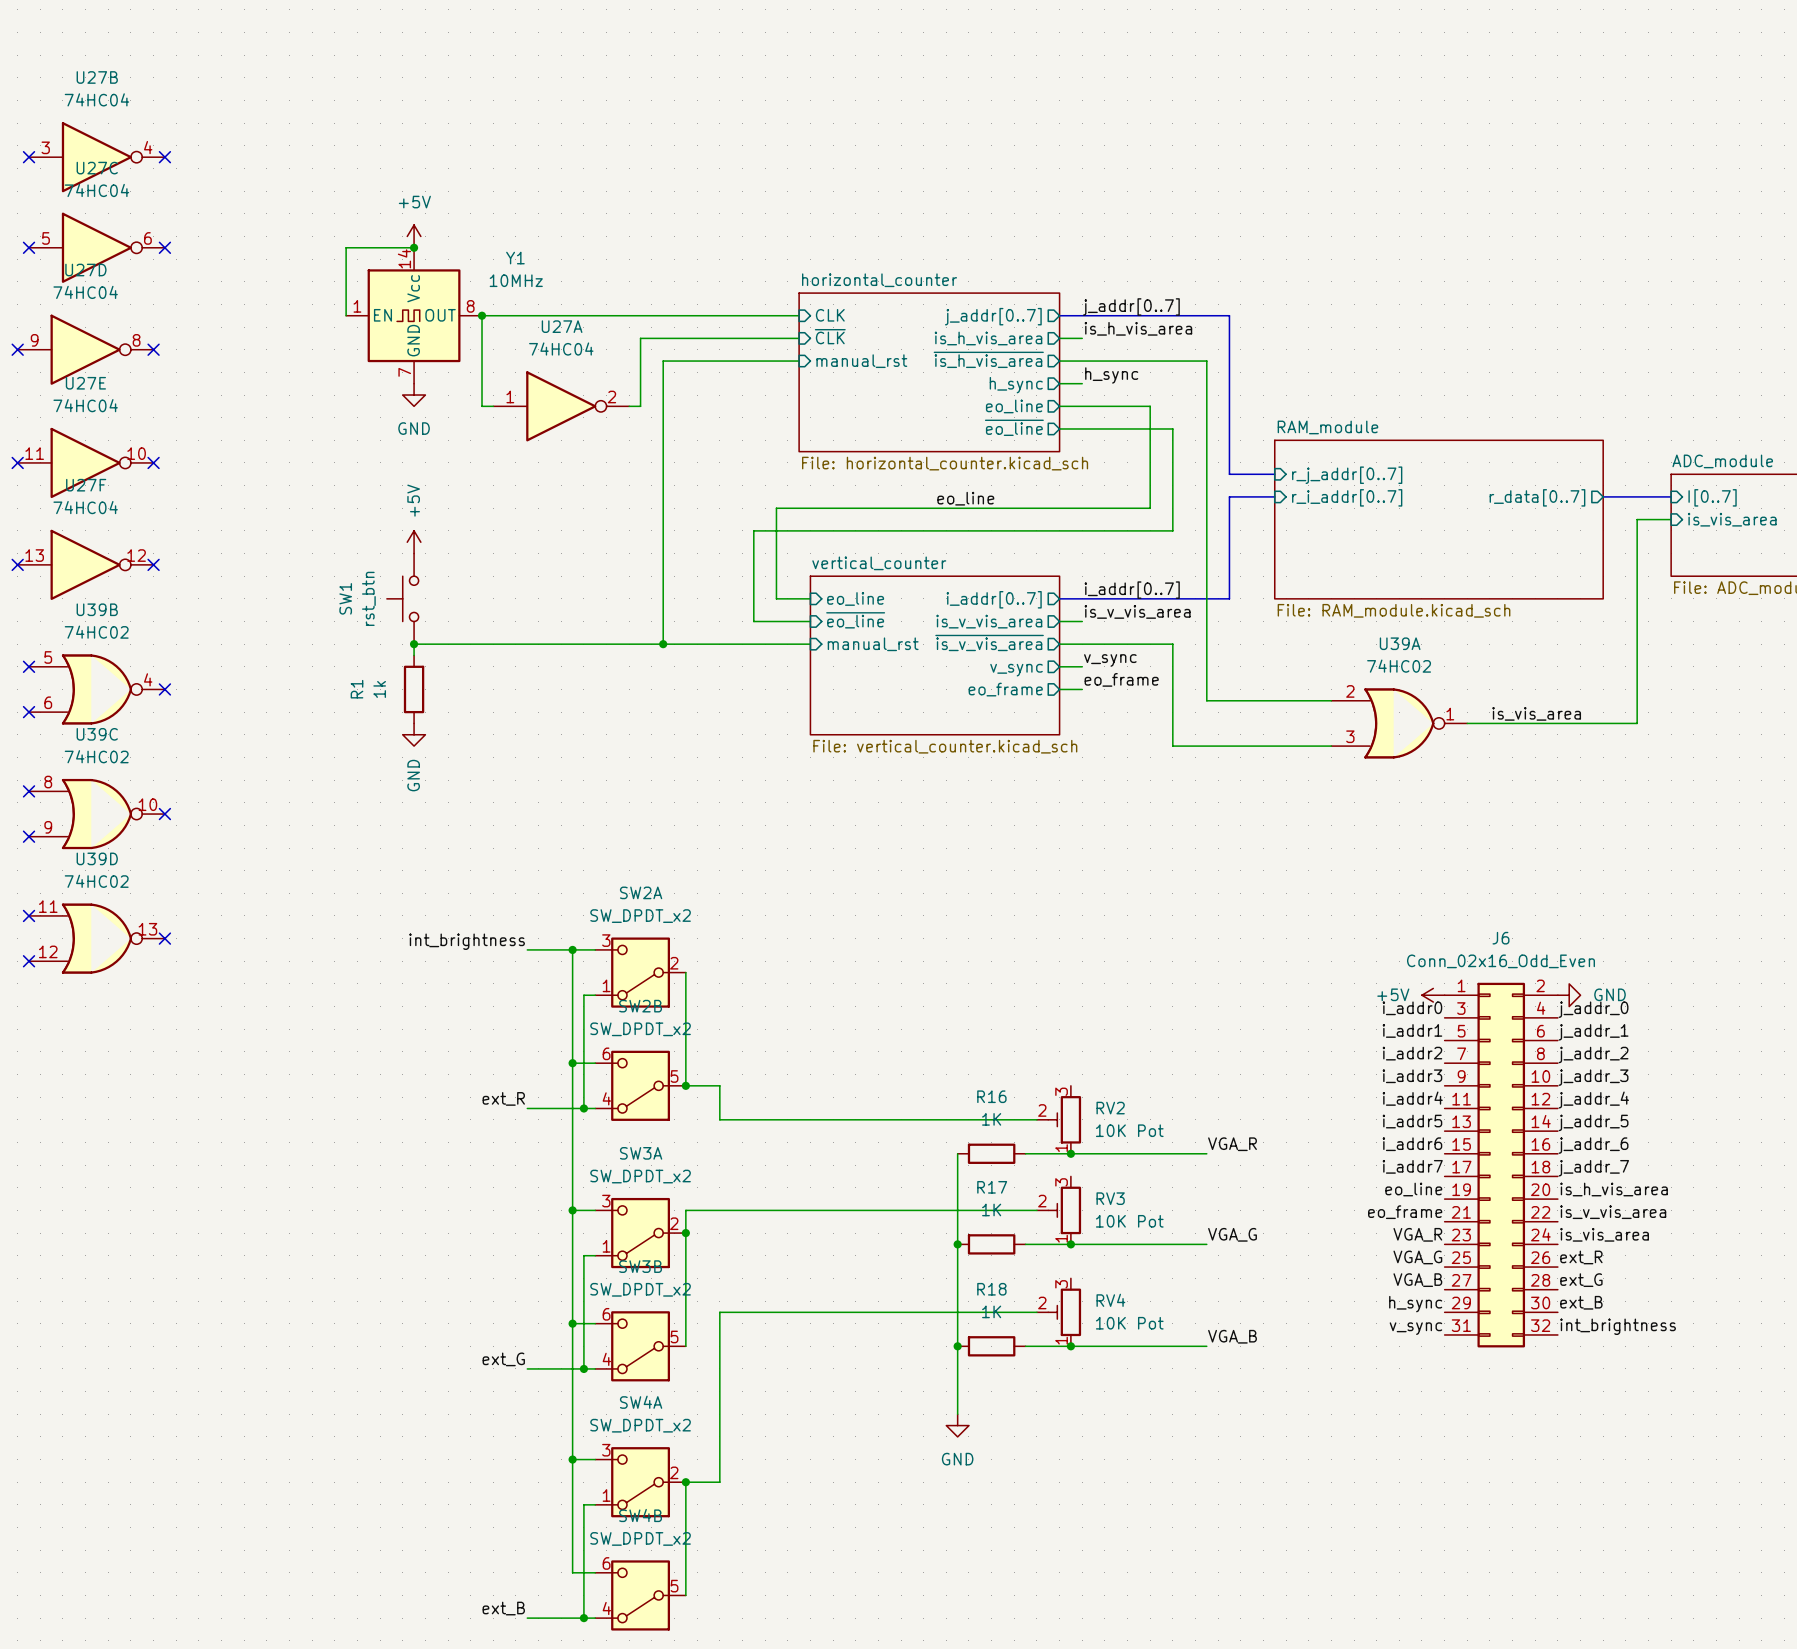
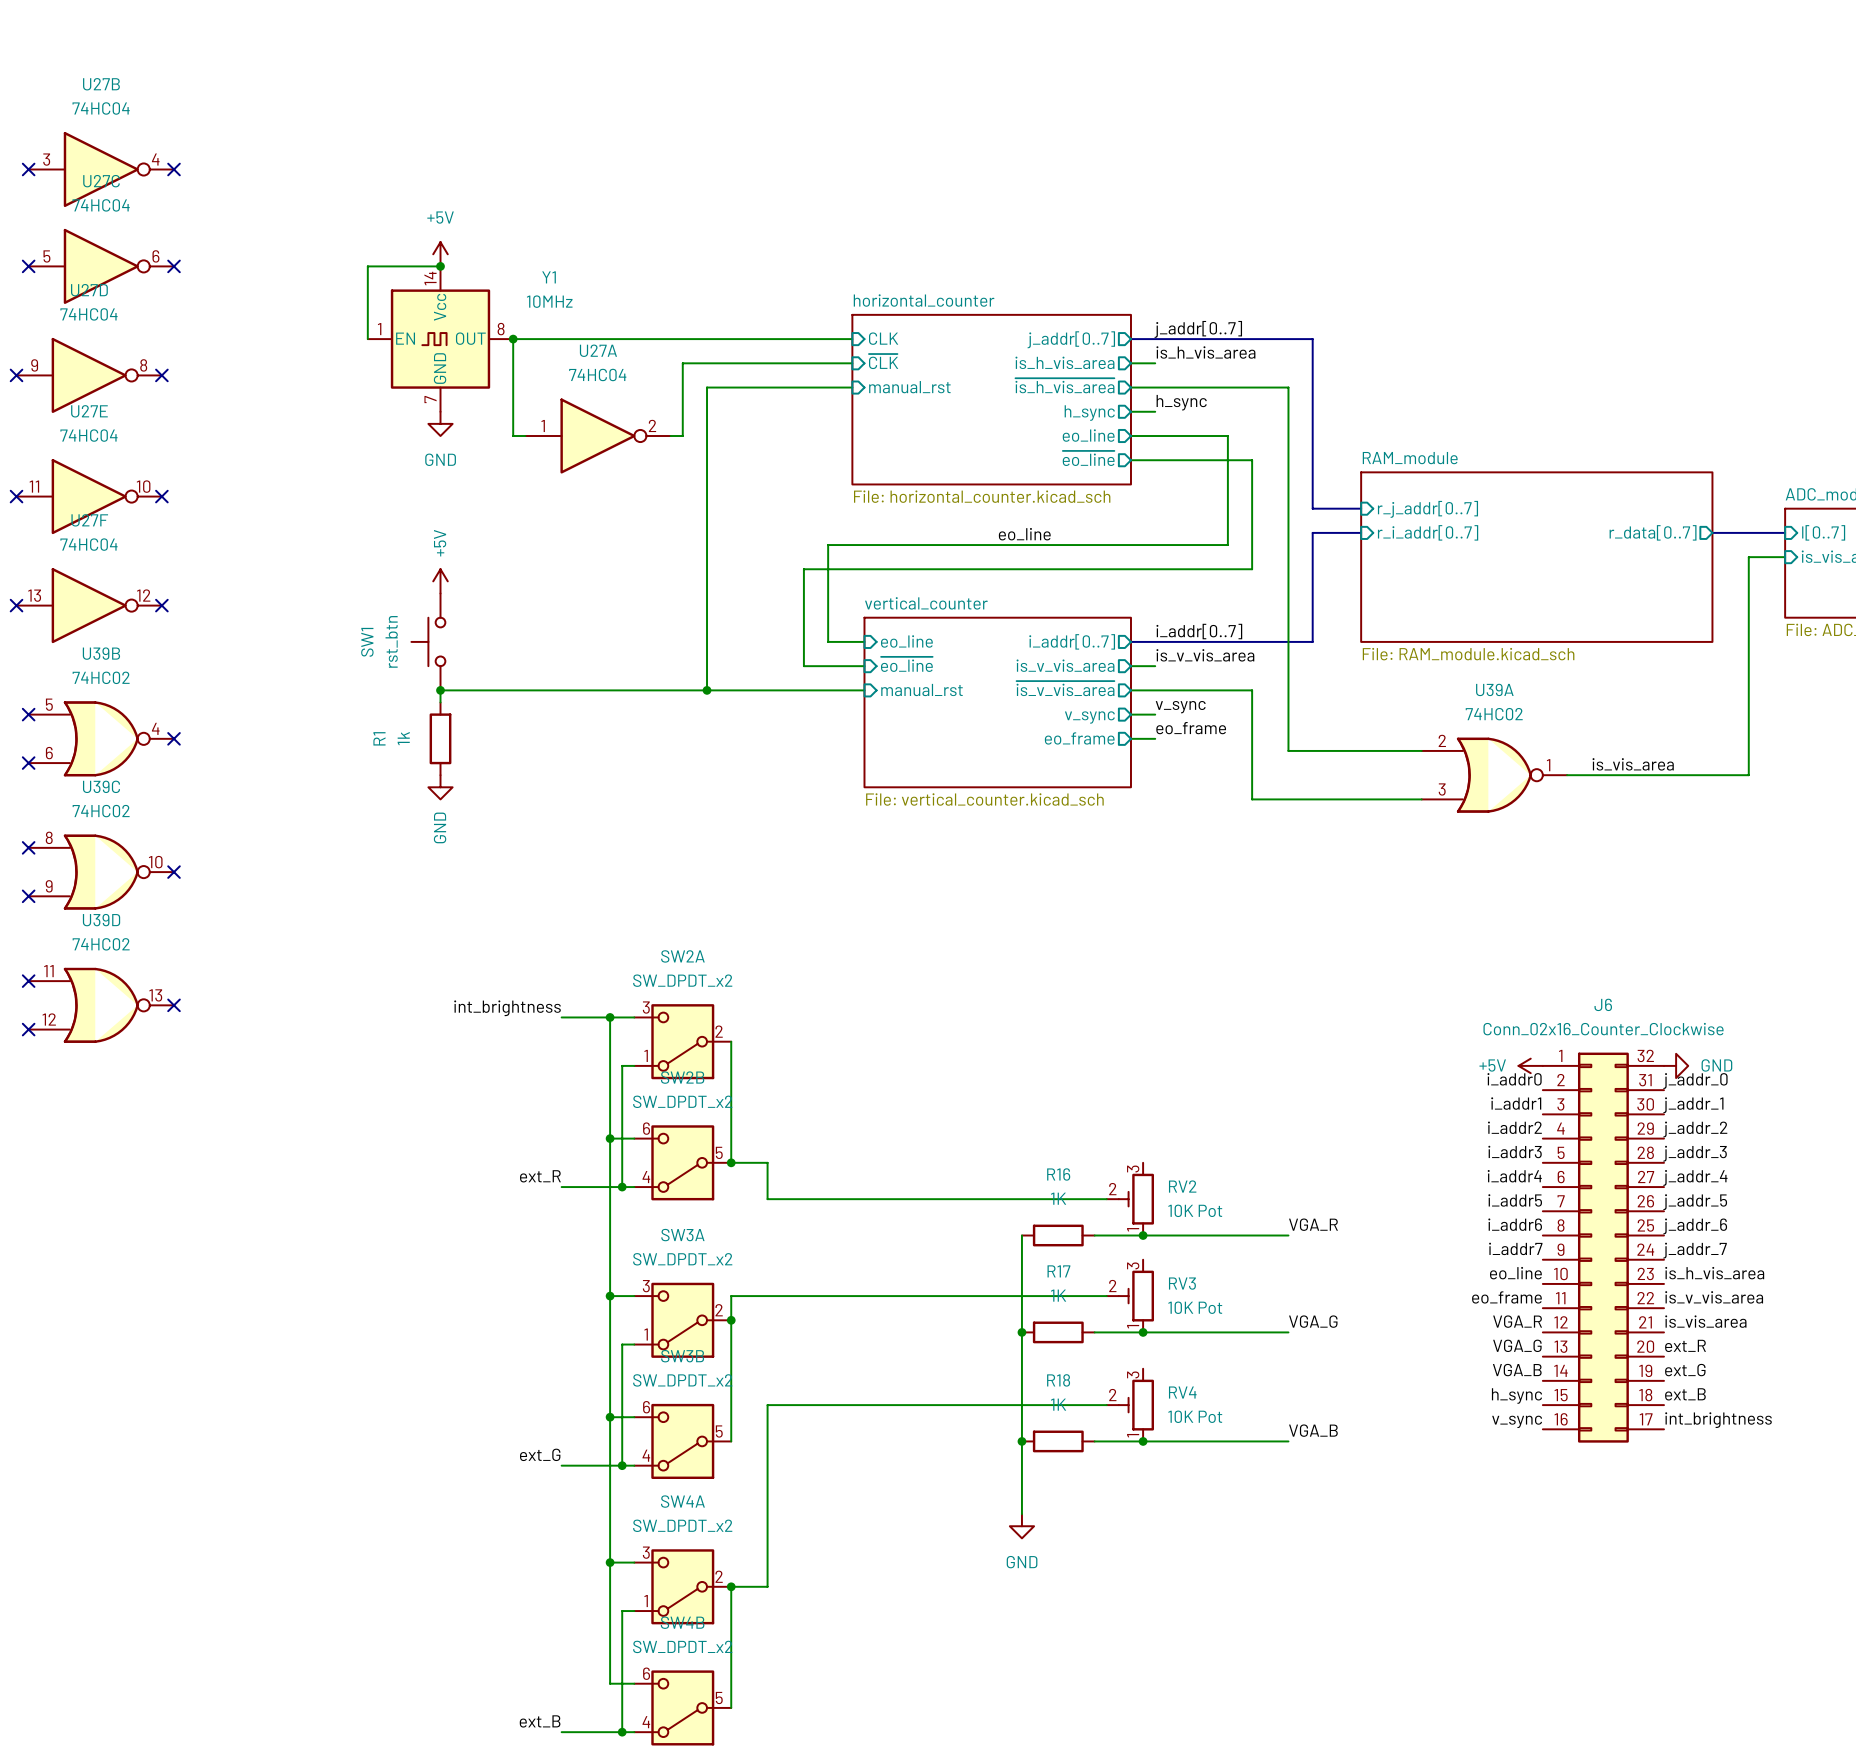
J6 value: Conn_02x16_Odd_Even (1500, 961) -> Conn_02x16_Counter_Clockwise (1603, 1029)
J6 symbol: [1444, 982, 1558, 1348] -> [1542, 1052, 1664, 1443]

